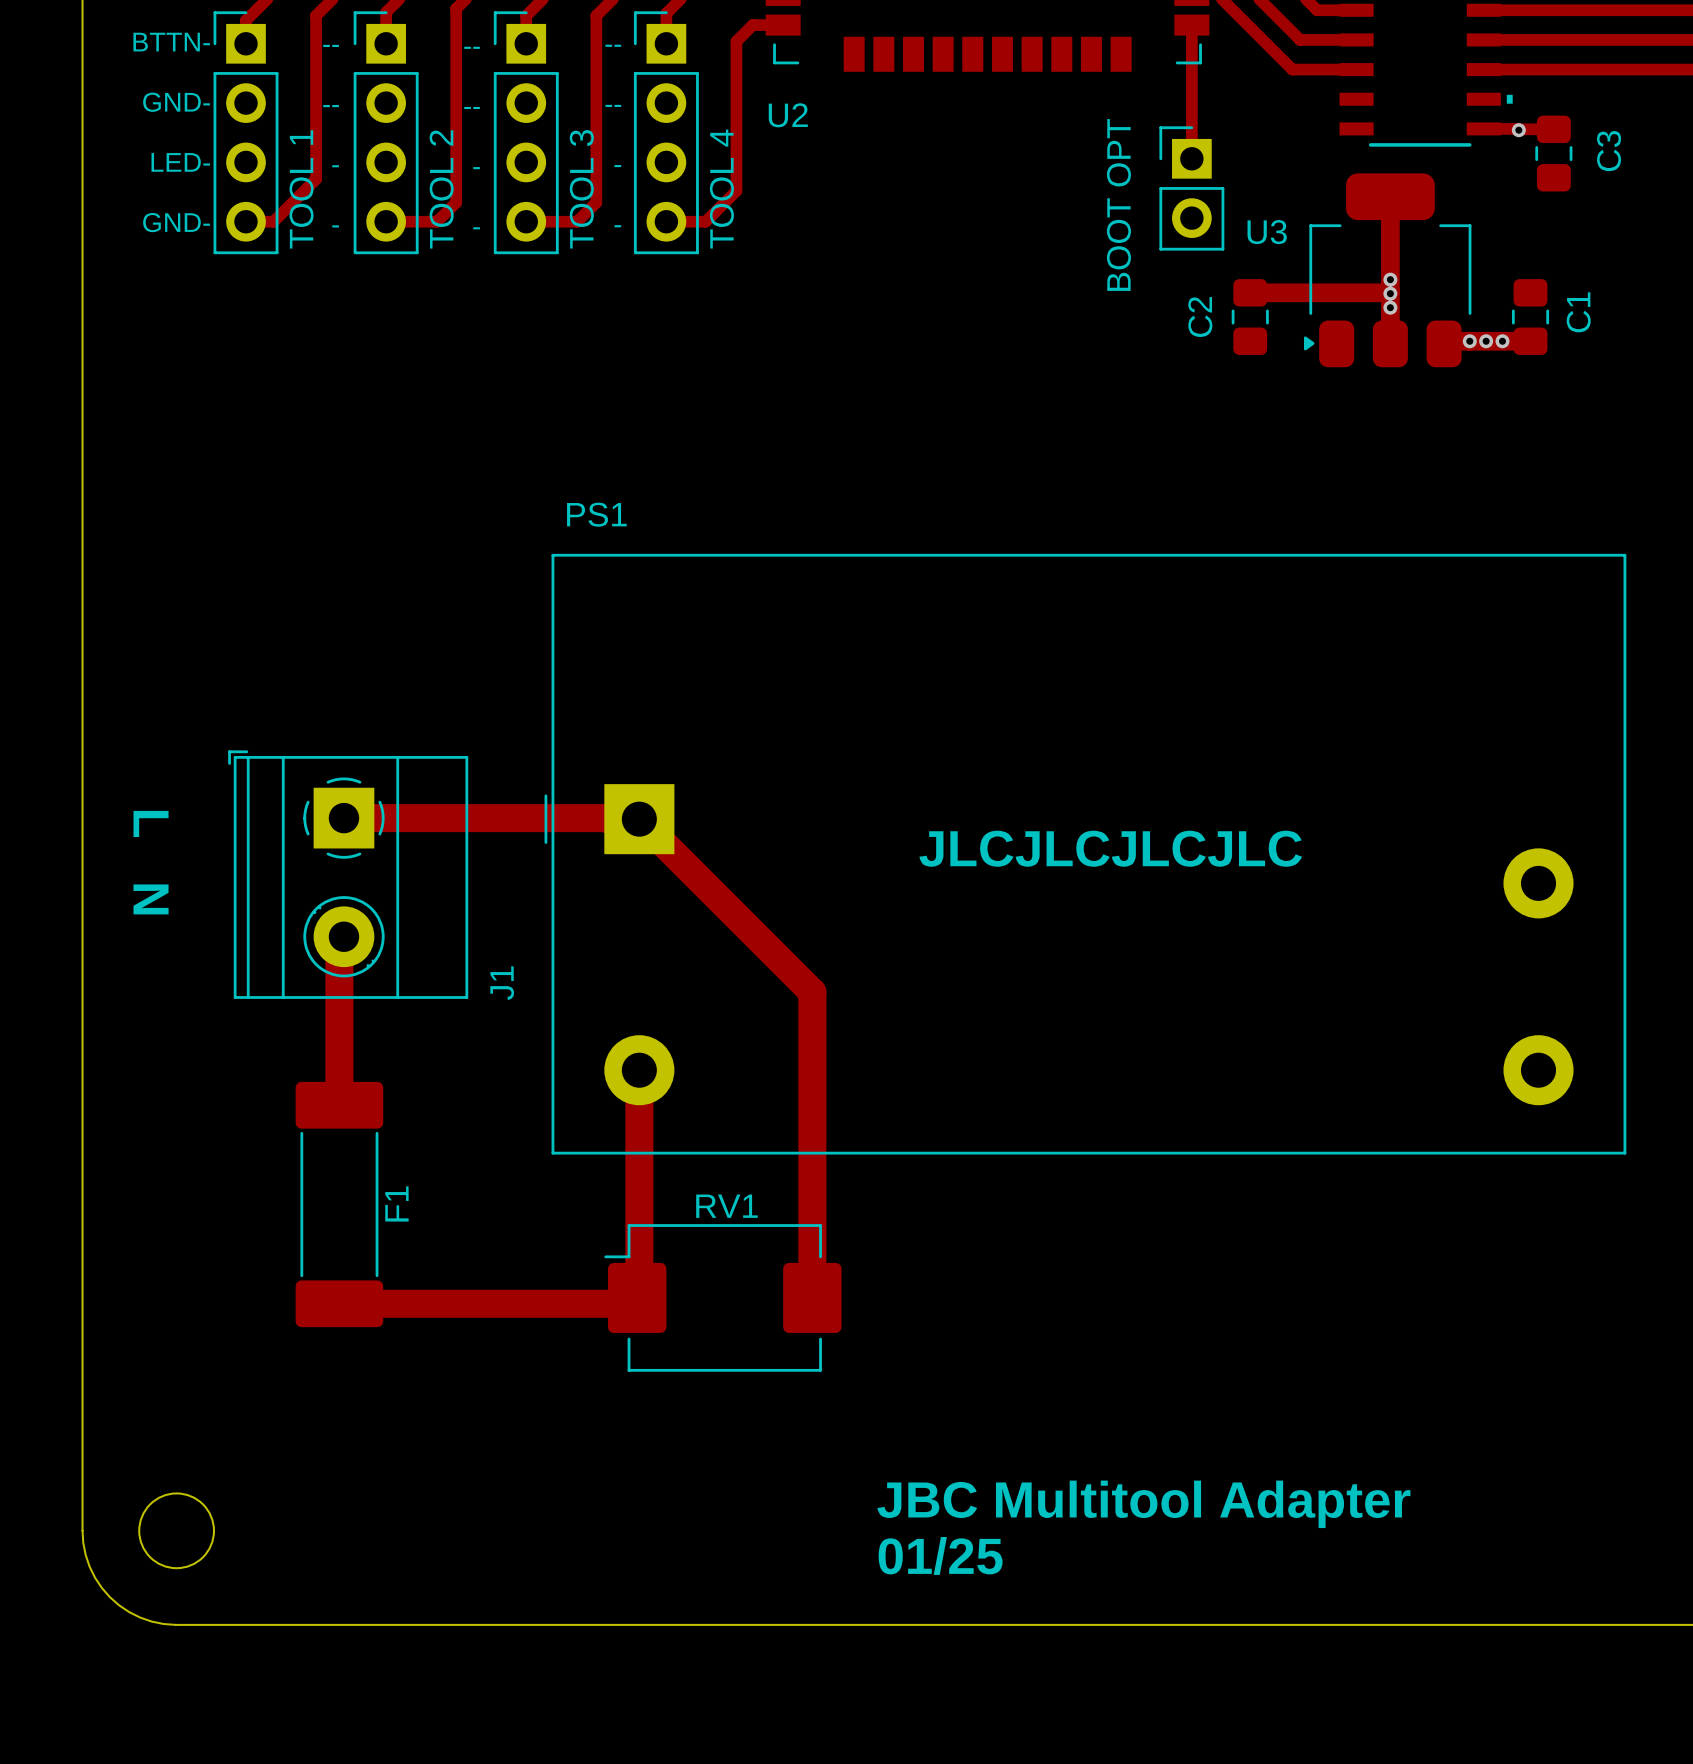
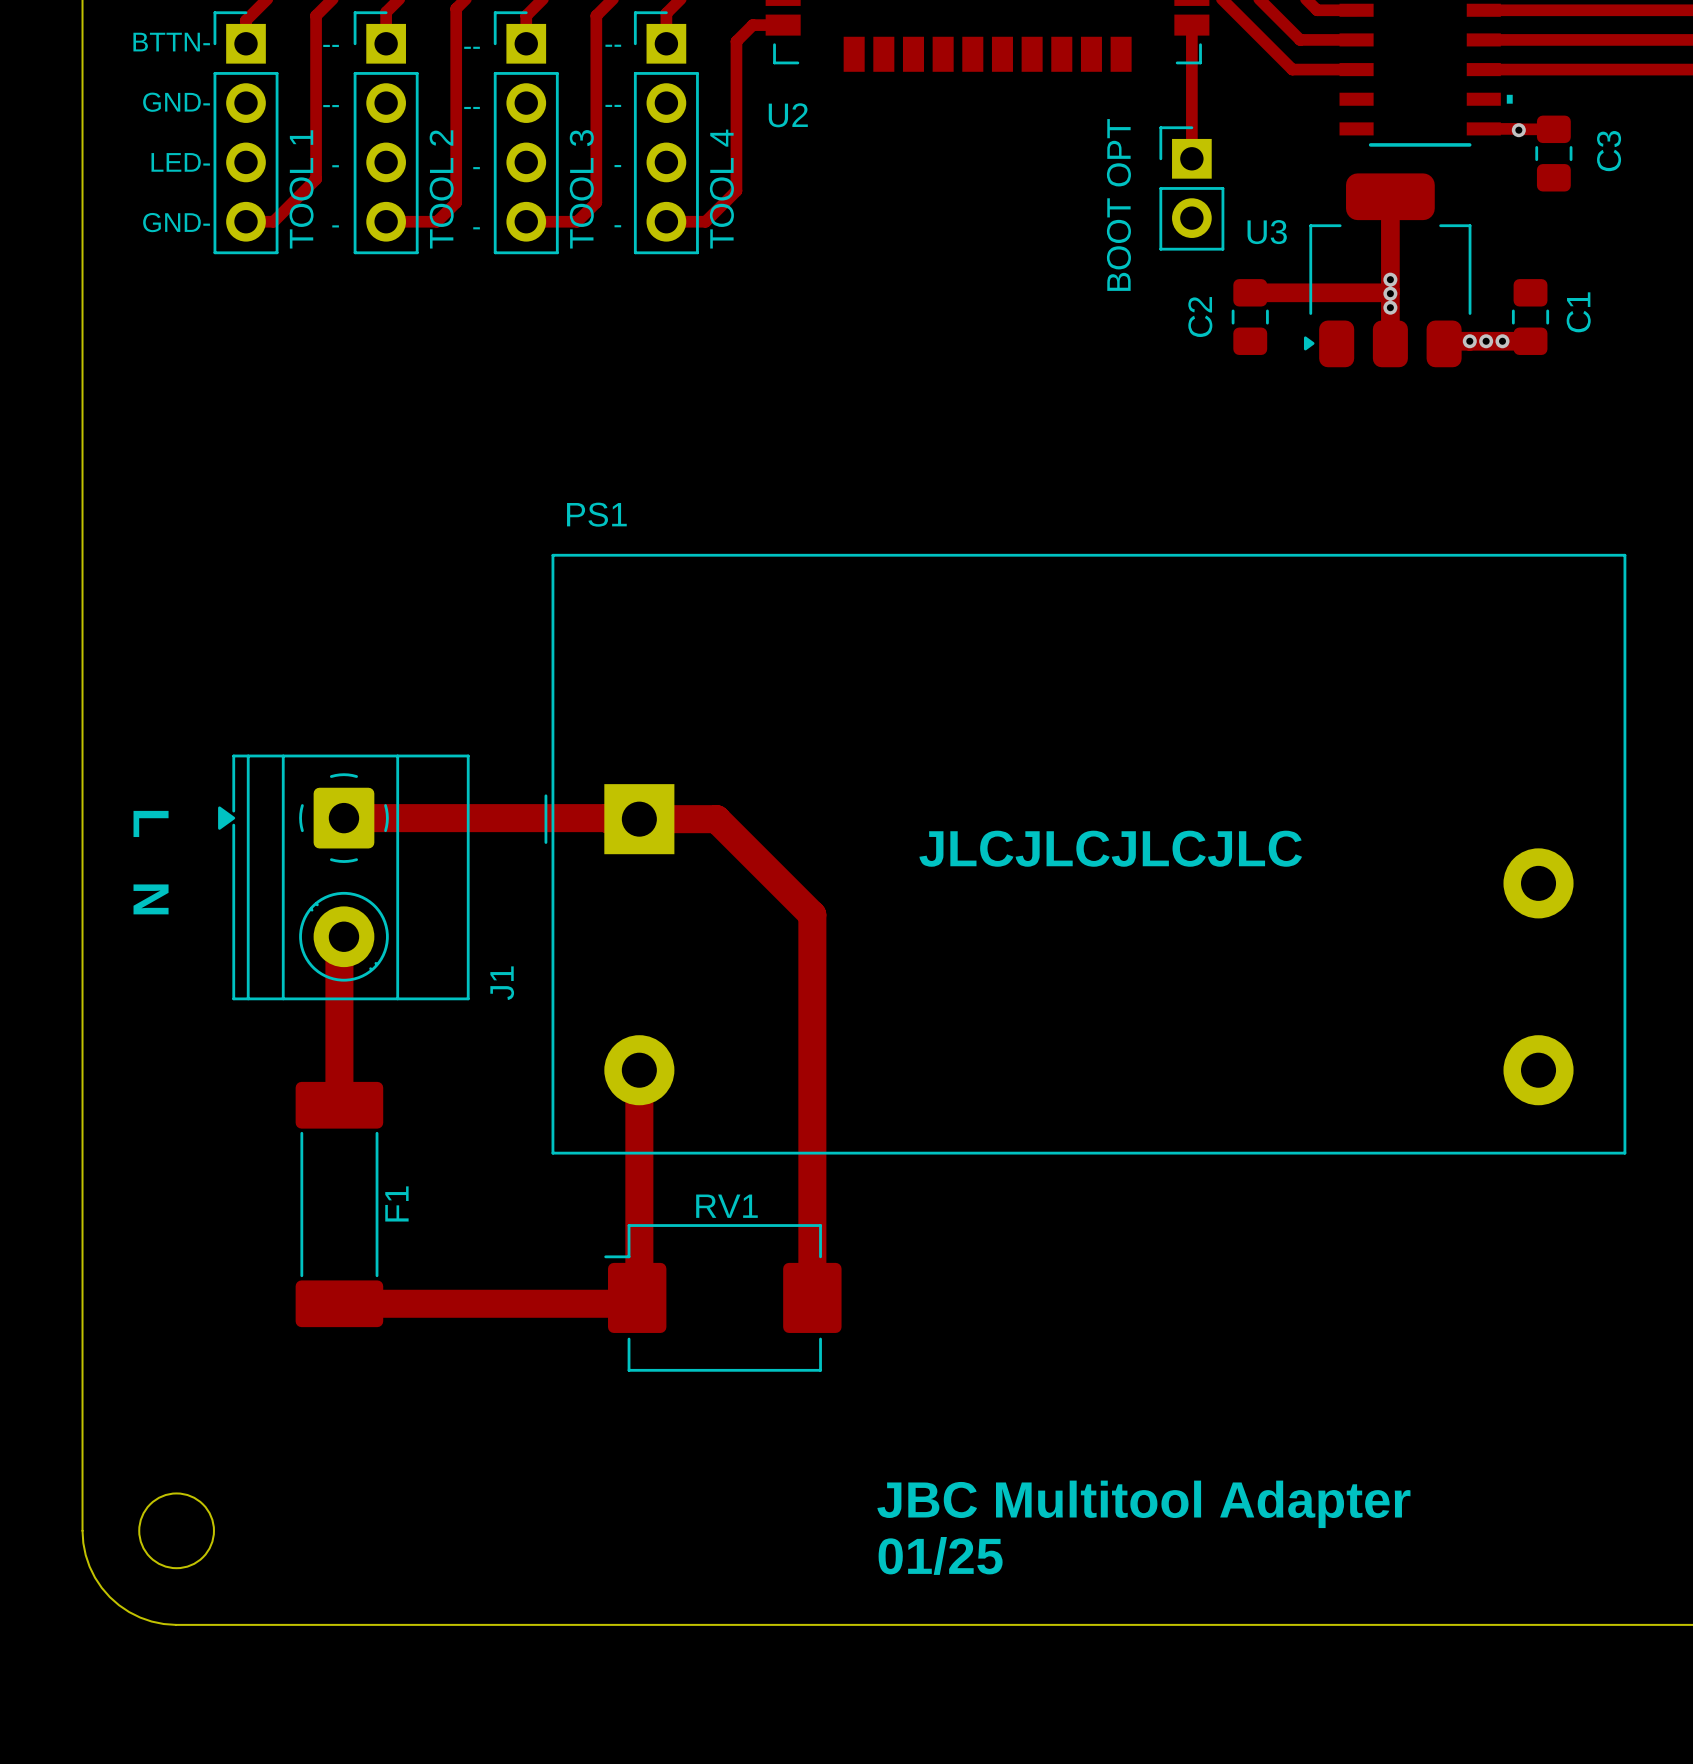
J1 footprint: [228, 750, 469, 999] -> [218, 754, 470, 1001]
top track: (639, 819) (812, 992) -> (639, 819) (716, 819) (812, 914) (812, 992)

